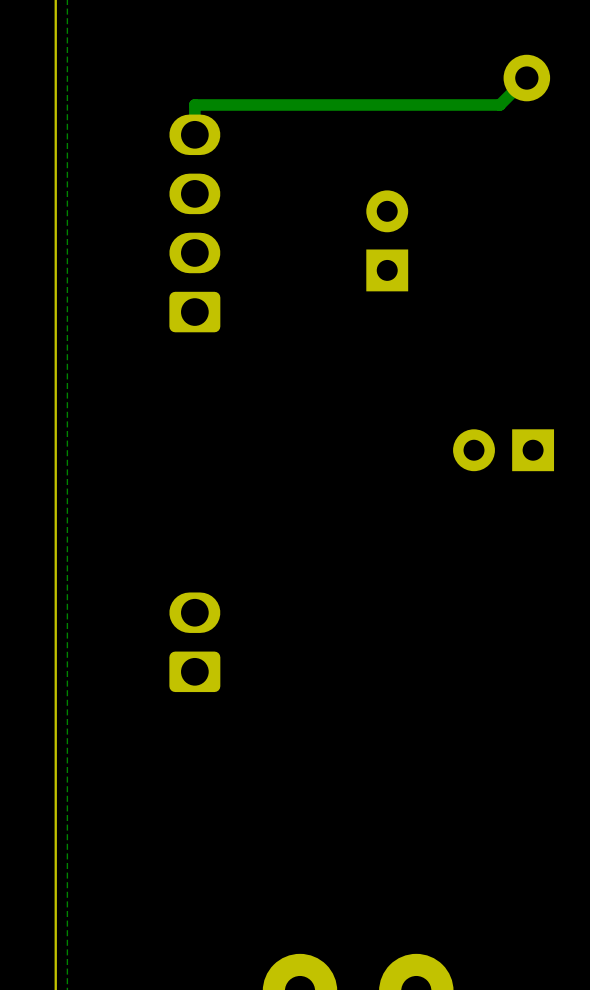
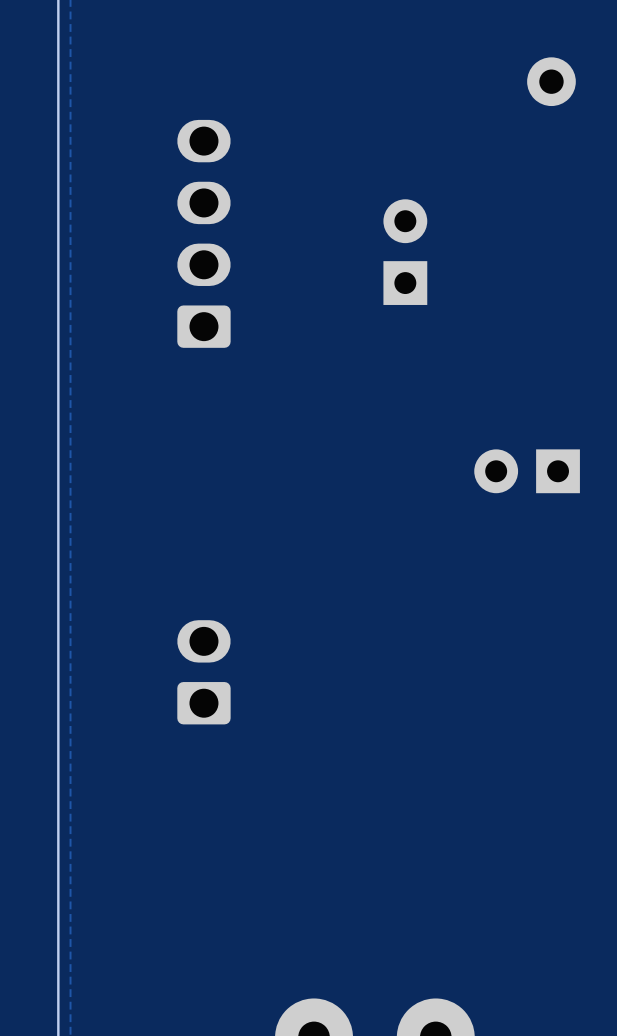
track: (526, 78) (499, 104) (194, 104) (194, 134) -> none

